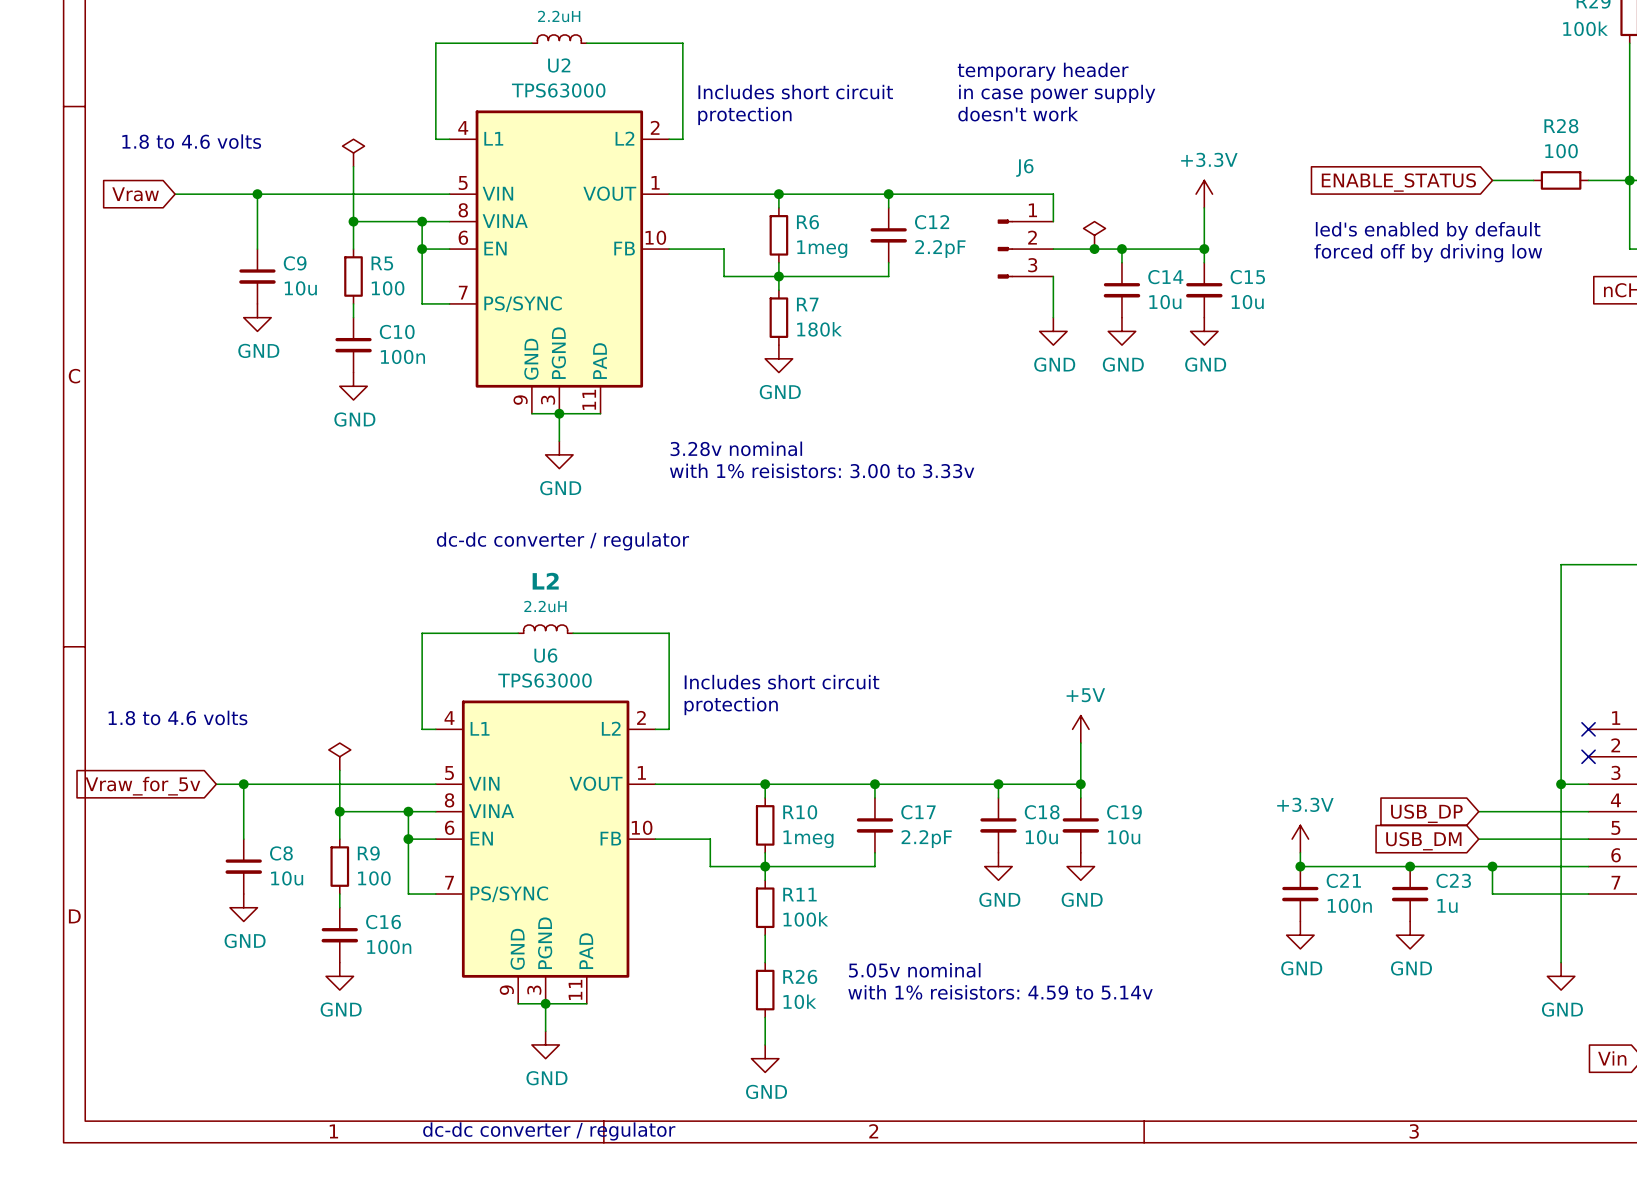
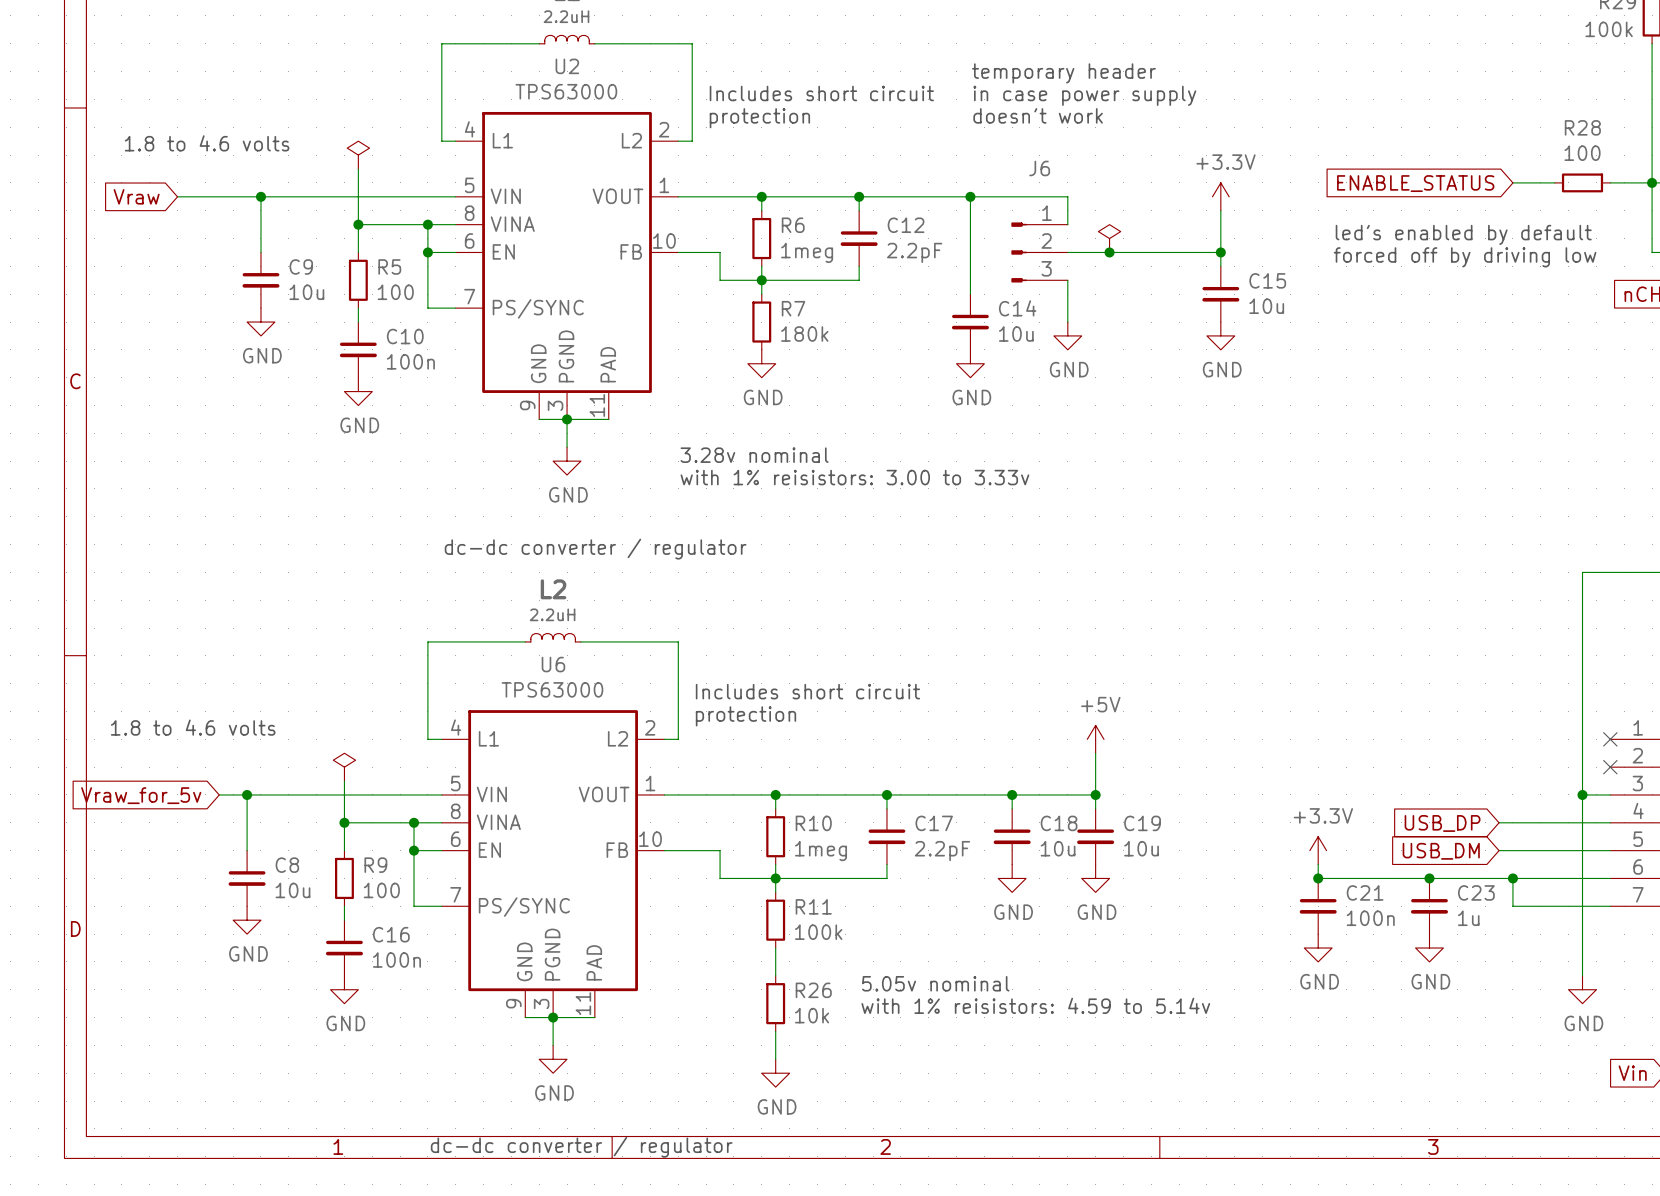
wire: (778, 194) (778, 207) -> (761, 196) (761, 210)
junction position: (778, 194) -> (761, 196)
junction: none -> (859, 196)
wire: (888, 194) (888, 207) -> (859, 196) (859, 210)
junction: (888, 194) -> none
wire: none -> (970, 196) (970, 294)
junction: none -> (970, 196)
R6 position: (778, 235) -> (761, 238)
C12 position: (888, 235) -> (859, 238)
wire: (710, 249) (724, 249) (724, 276) -> (720, 252) (720, 280) (733, 280)
wire: (1121, 249) (1121, 262) -> none
junction: (1121, 249) -> none
wire: (778, 262) (778, 290) -> (761, 266) (761, 294)
wire: (888, 262) (888, 276) (847, 276) -> (859, 266) (859, 280)
junction position: (778, 276) -> (761, 280)
C14 position: (1121, 290) -> (970, 322)
R7 position: (778, 317) -> (761, 322)
power symbol: GND (1121, 331) -> none
power symbol position: GND (778, 358) -> GND (761, 363)
power symbol: none -> GND (970, 363)

